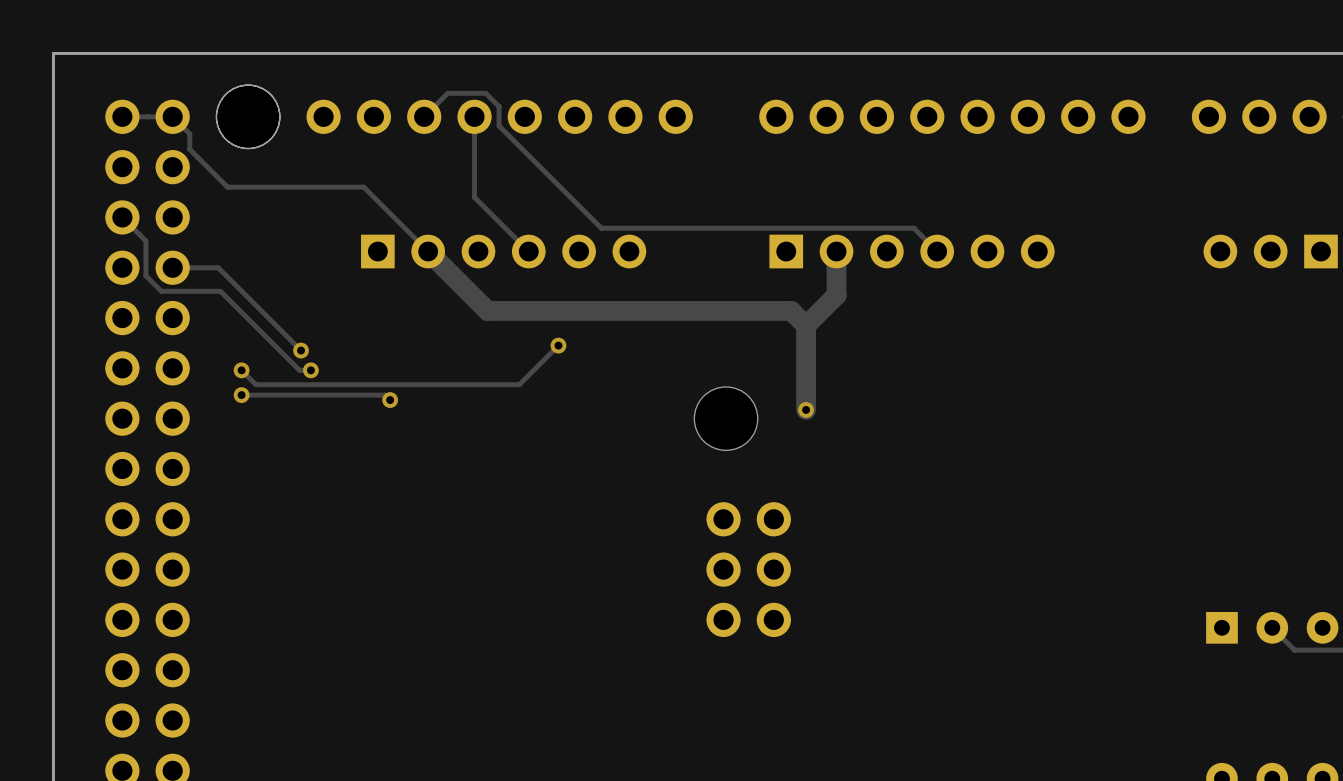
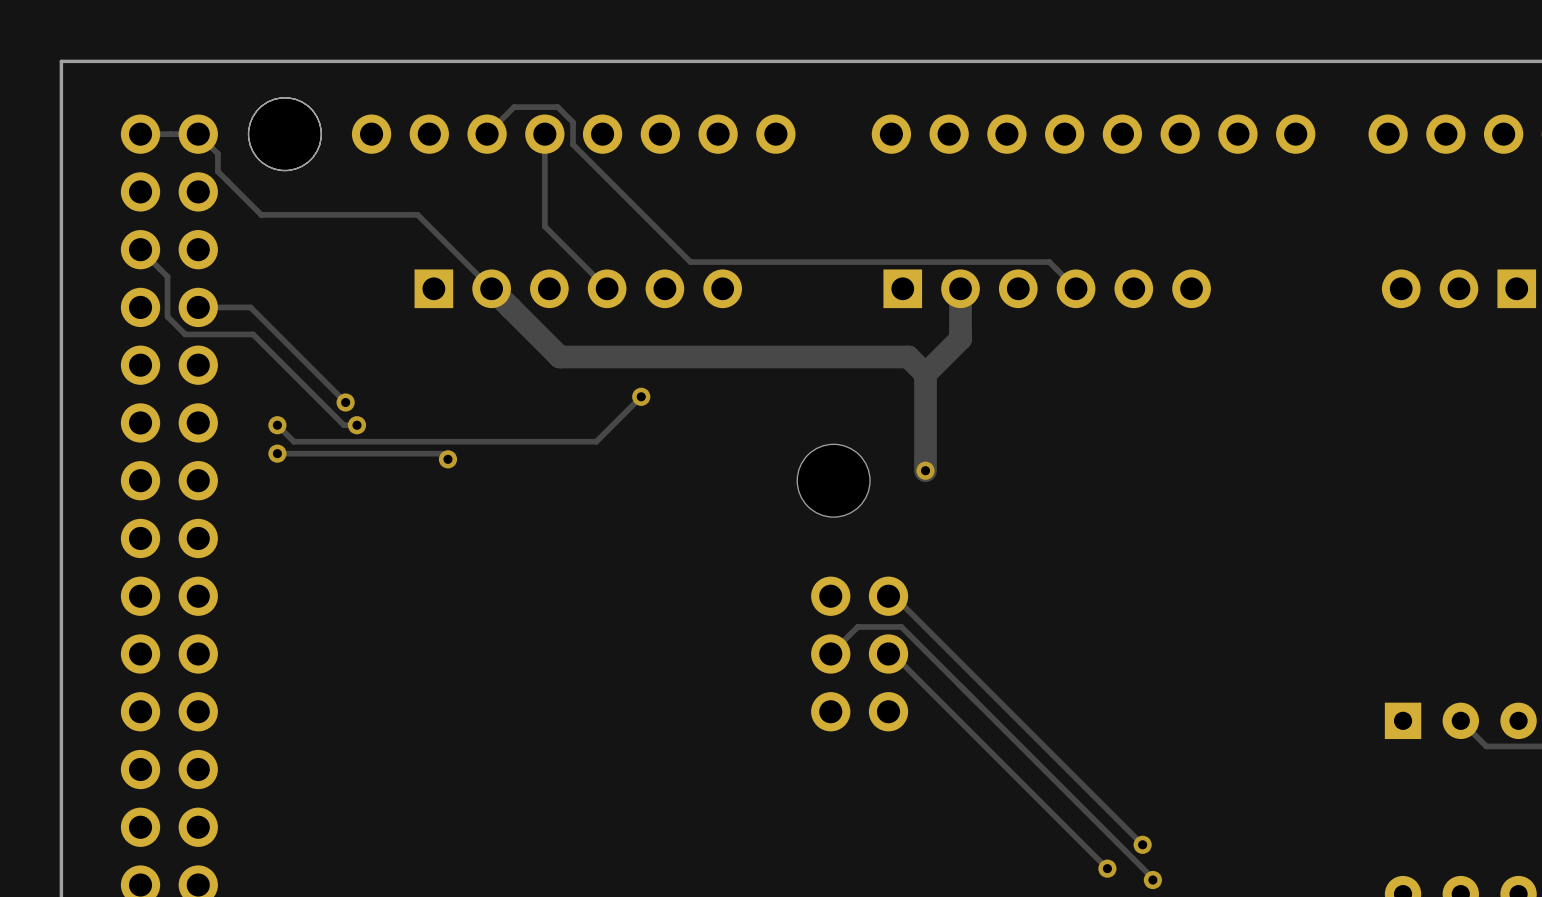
track: none -> (888, 596) (894, 596) (1142, 844)
track: none -> (830, 653) (857, 626) (901, 626) (1153, 878)
track: none -> (888, 653) (892, 653) (1107, 868)
via: none -> (1142, 844)
via: none -> (1107, 868)
via: none -> (1152, 880)

